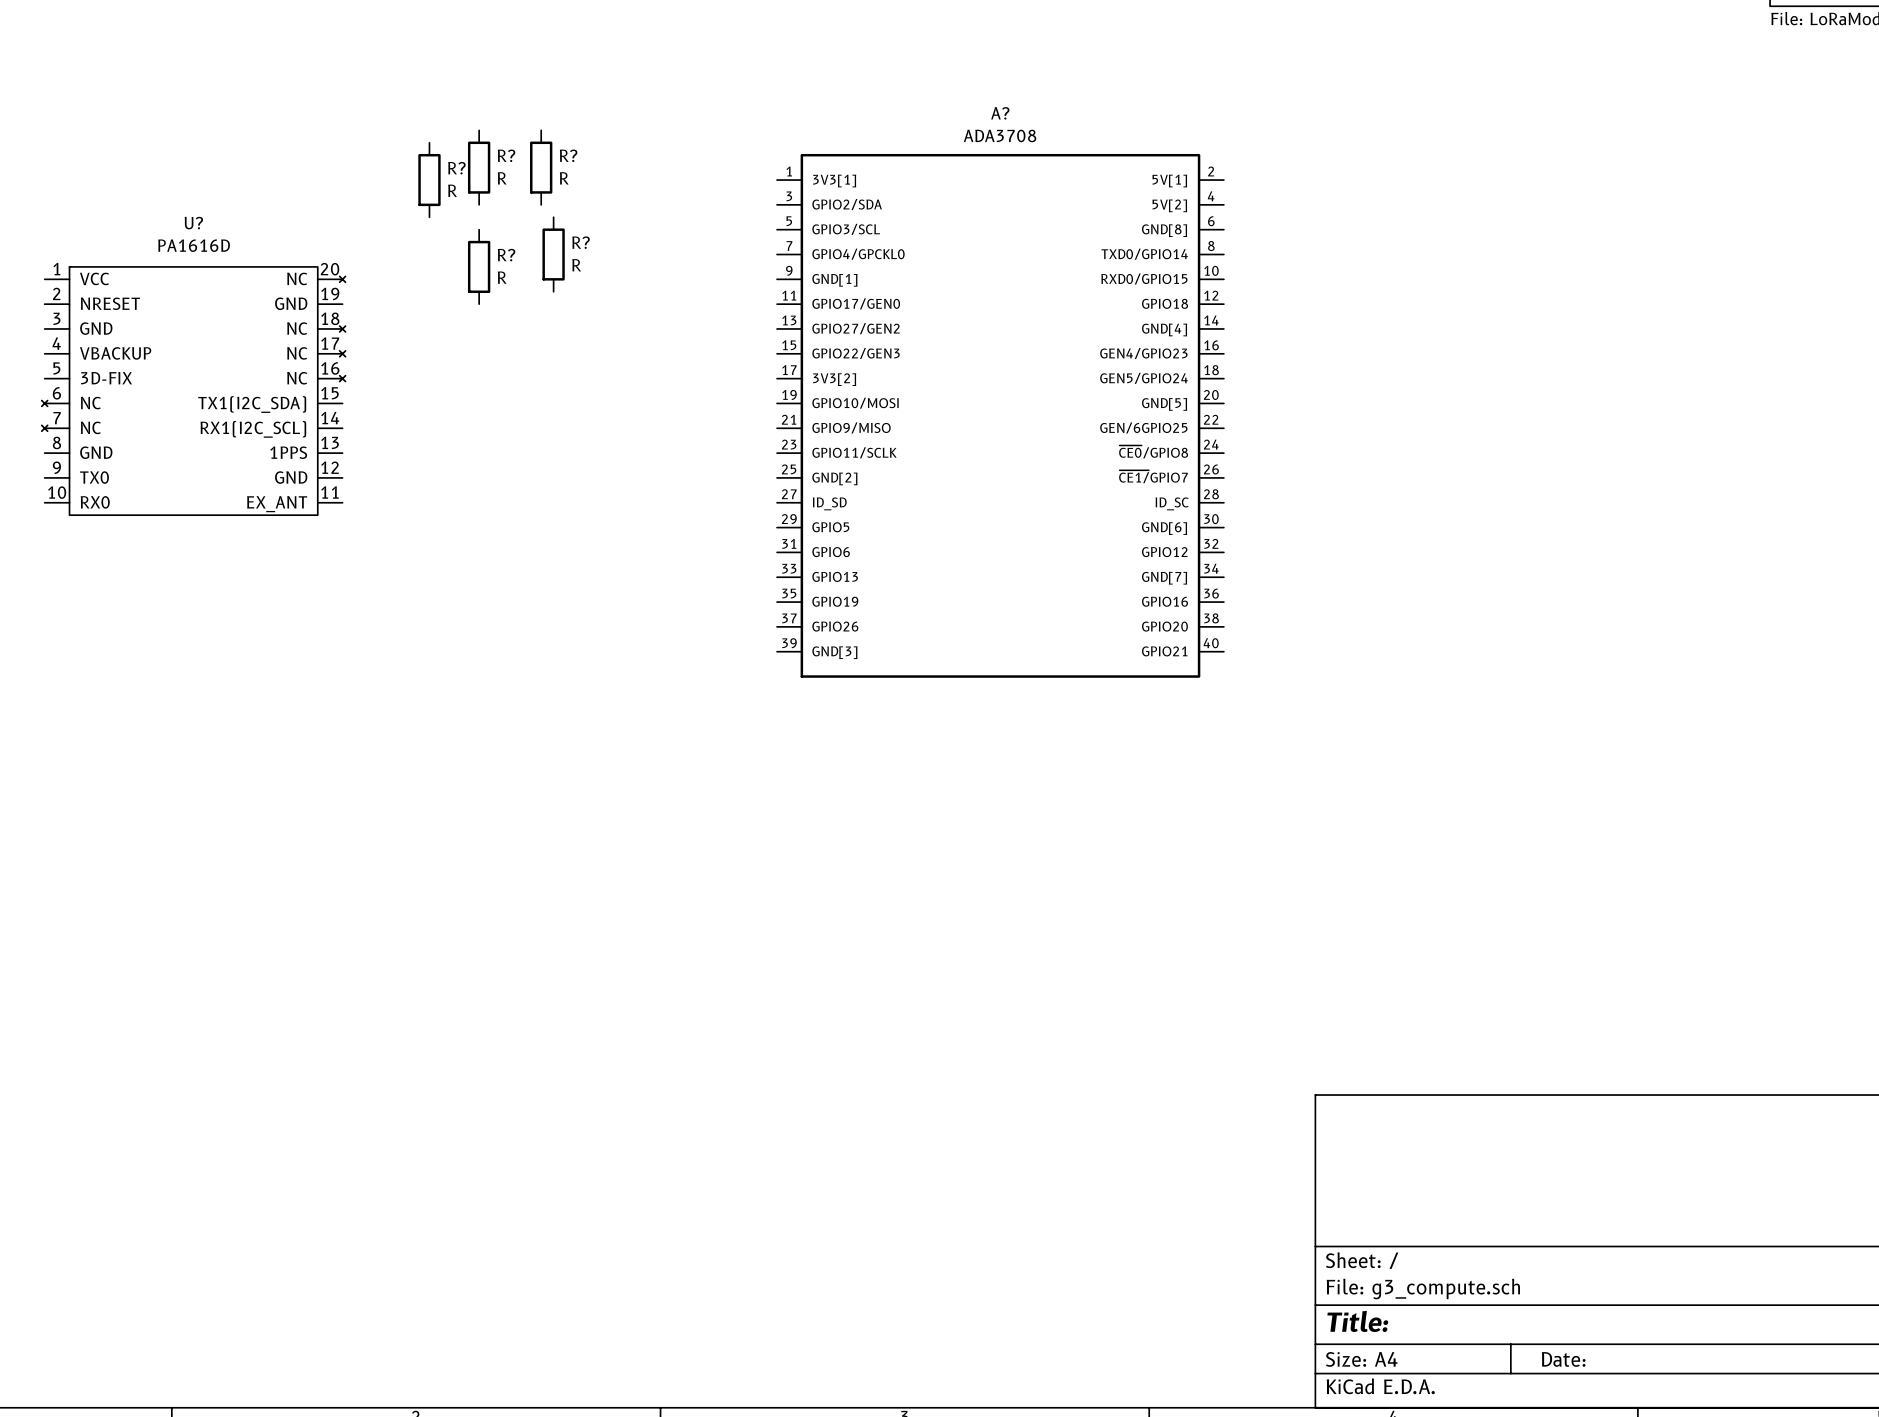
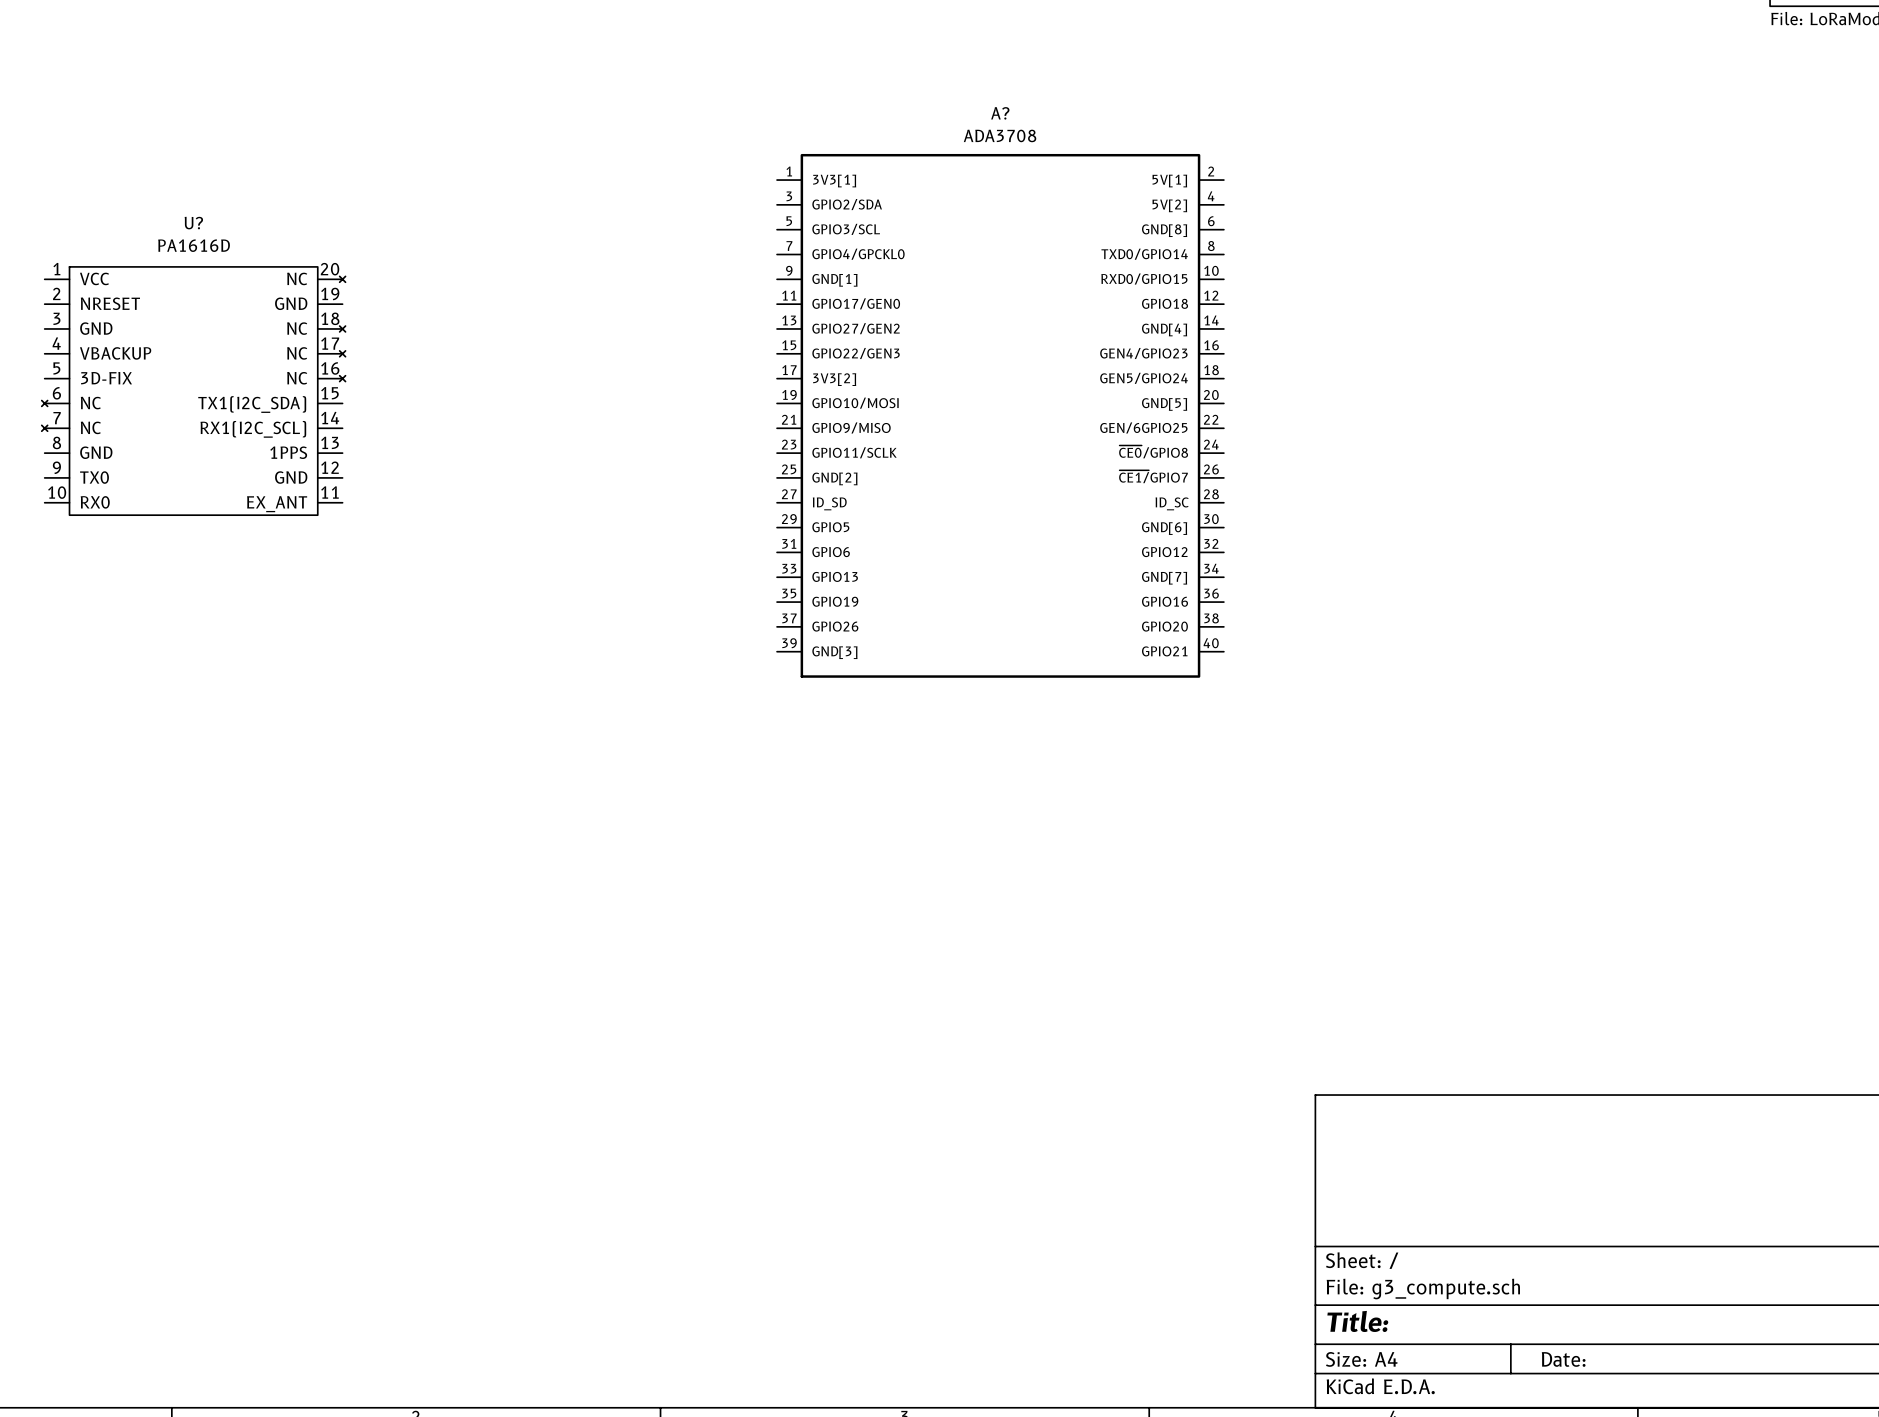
R?: R (479, 167) -> none
R?: R (541, 167) -> none
R?: R (429, 180) -> none
R?: R (553, 254) -> none
R?: R (479, 266) -> none

